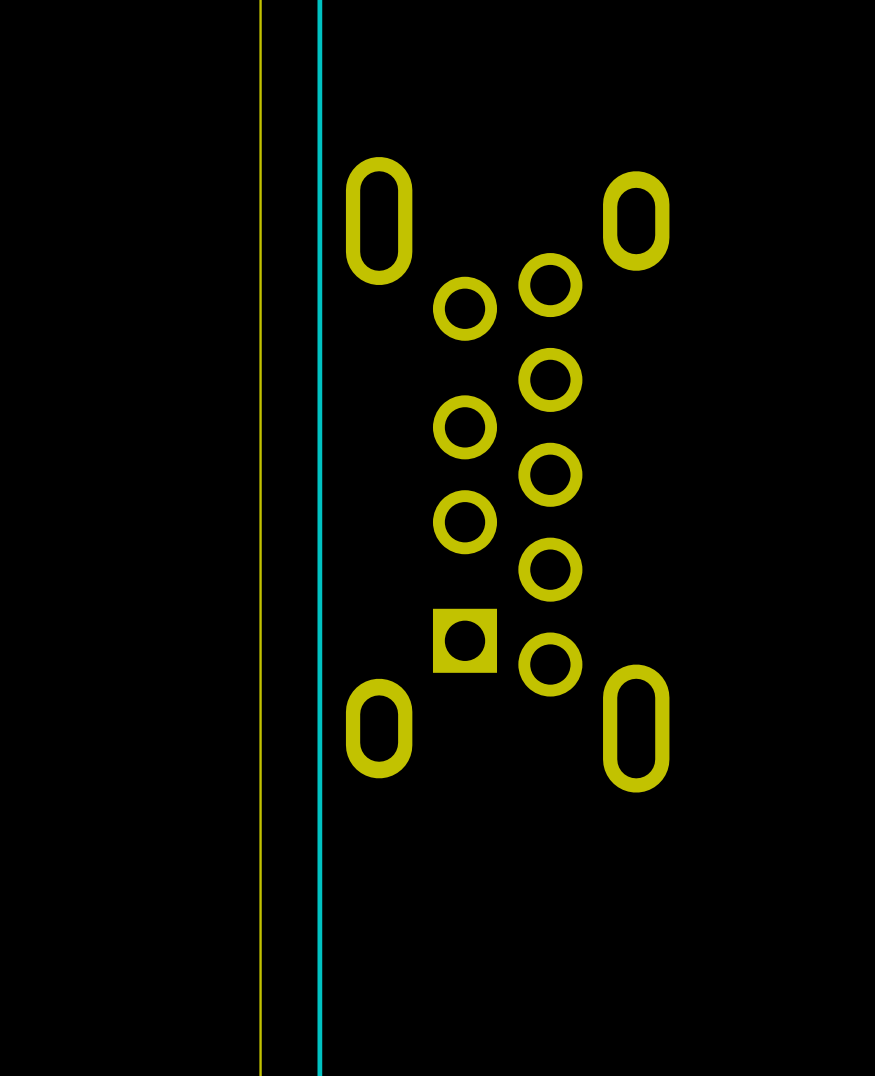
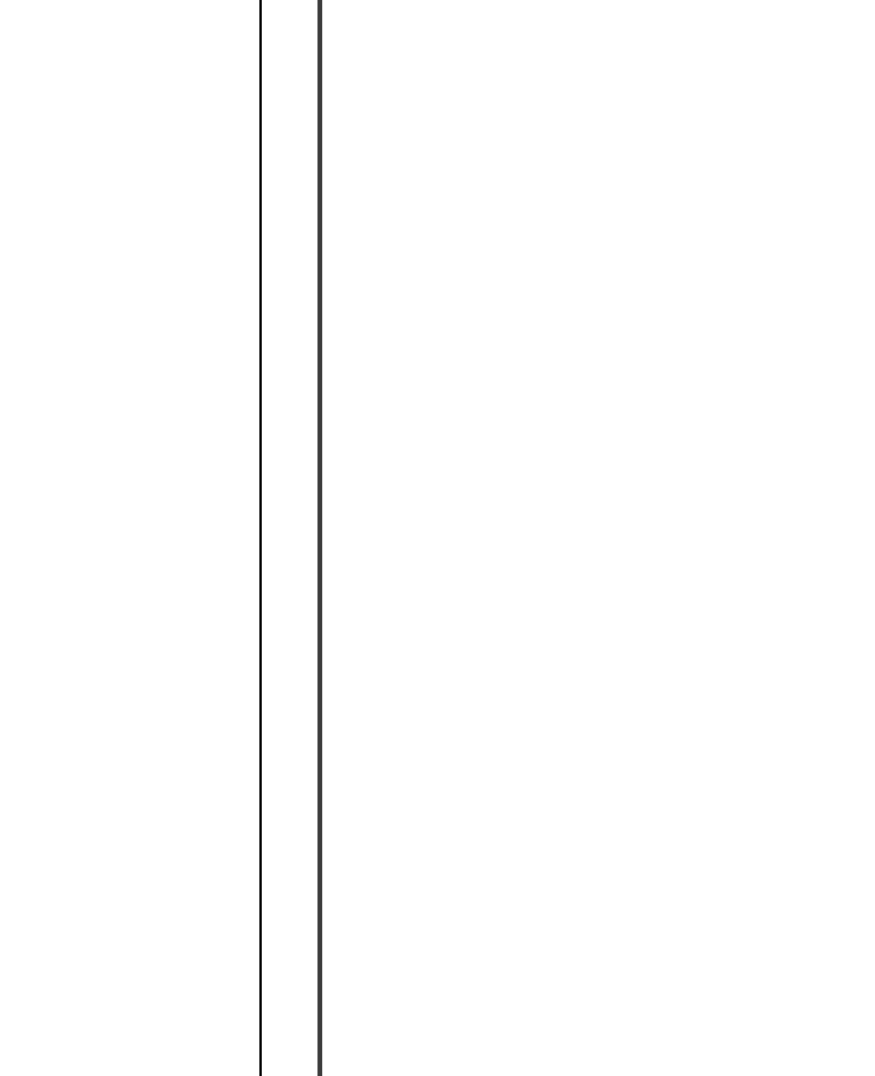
part: (507, 474) -> none

